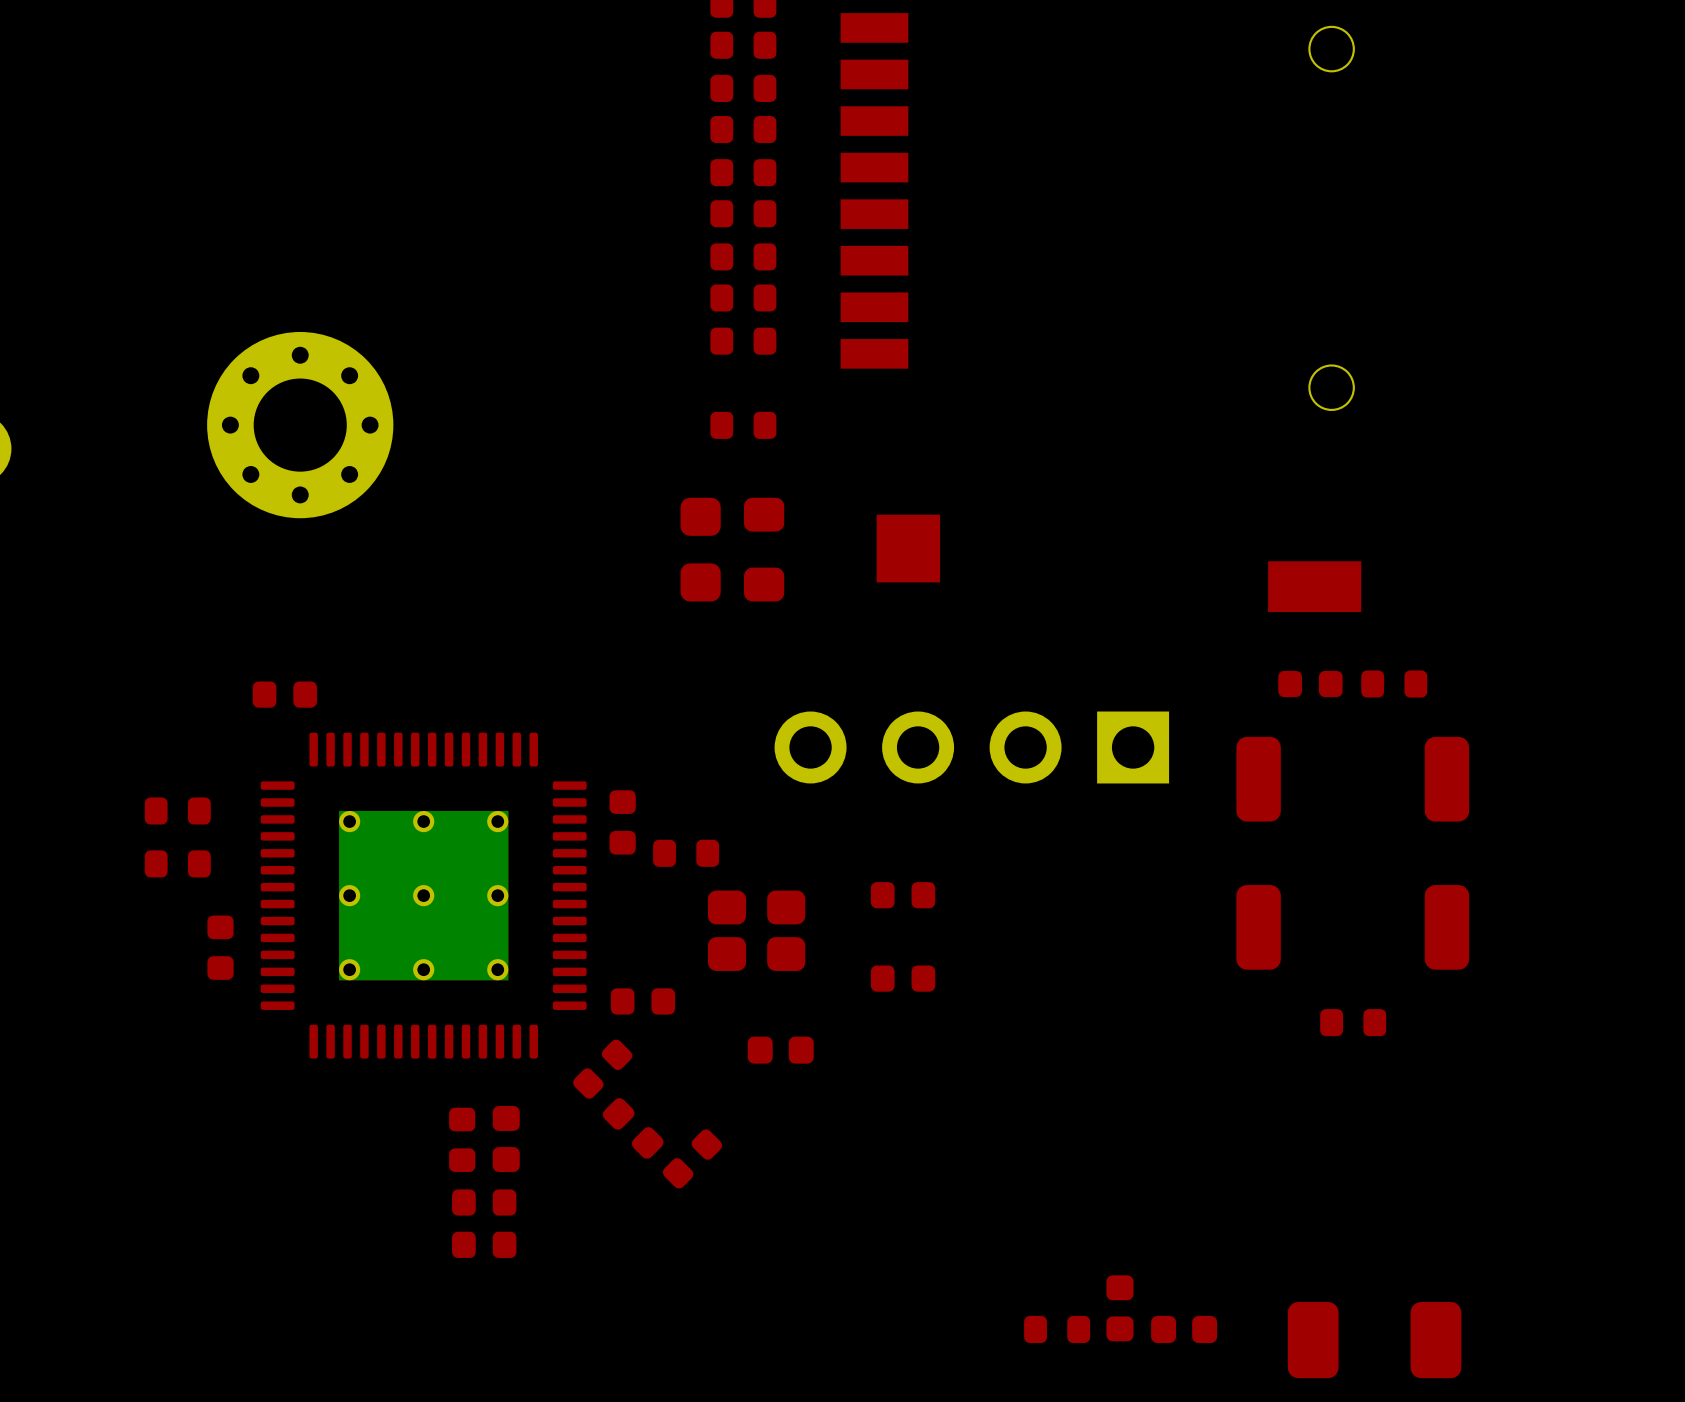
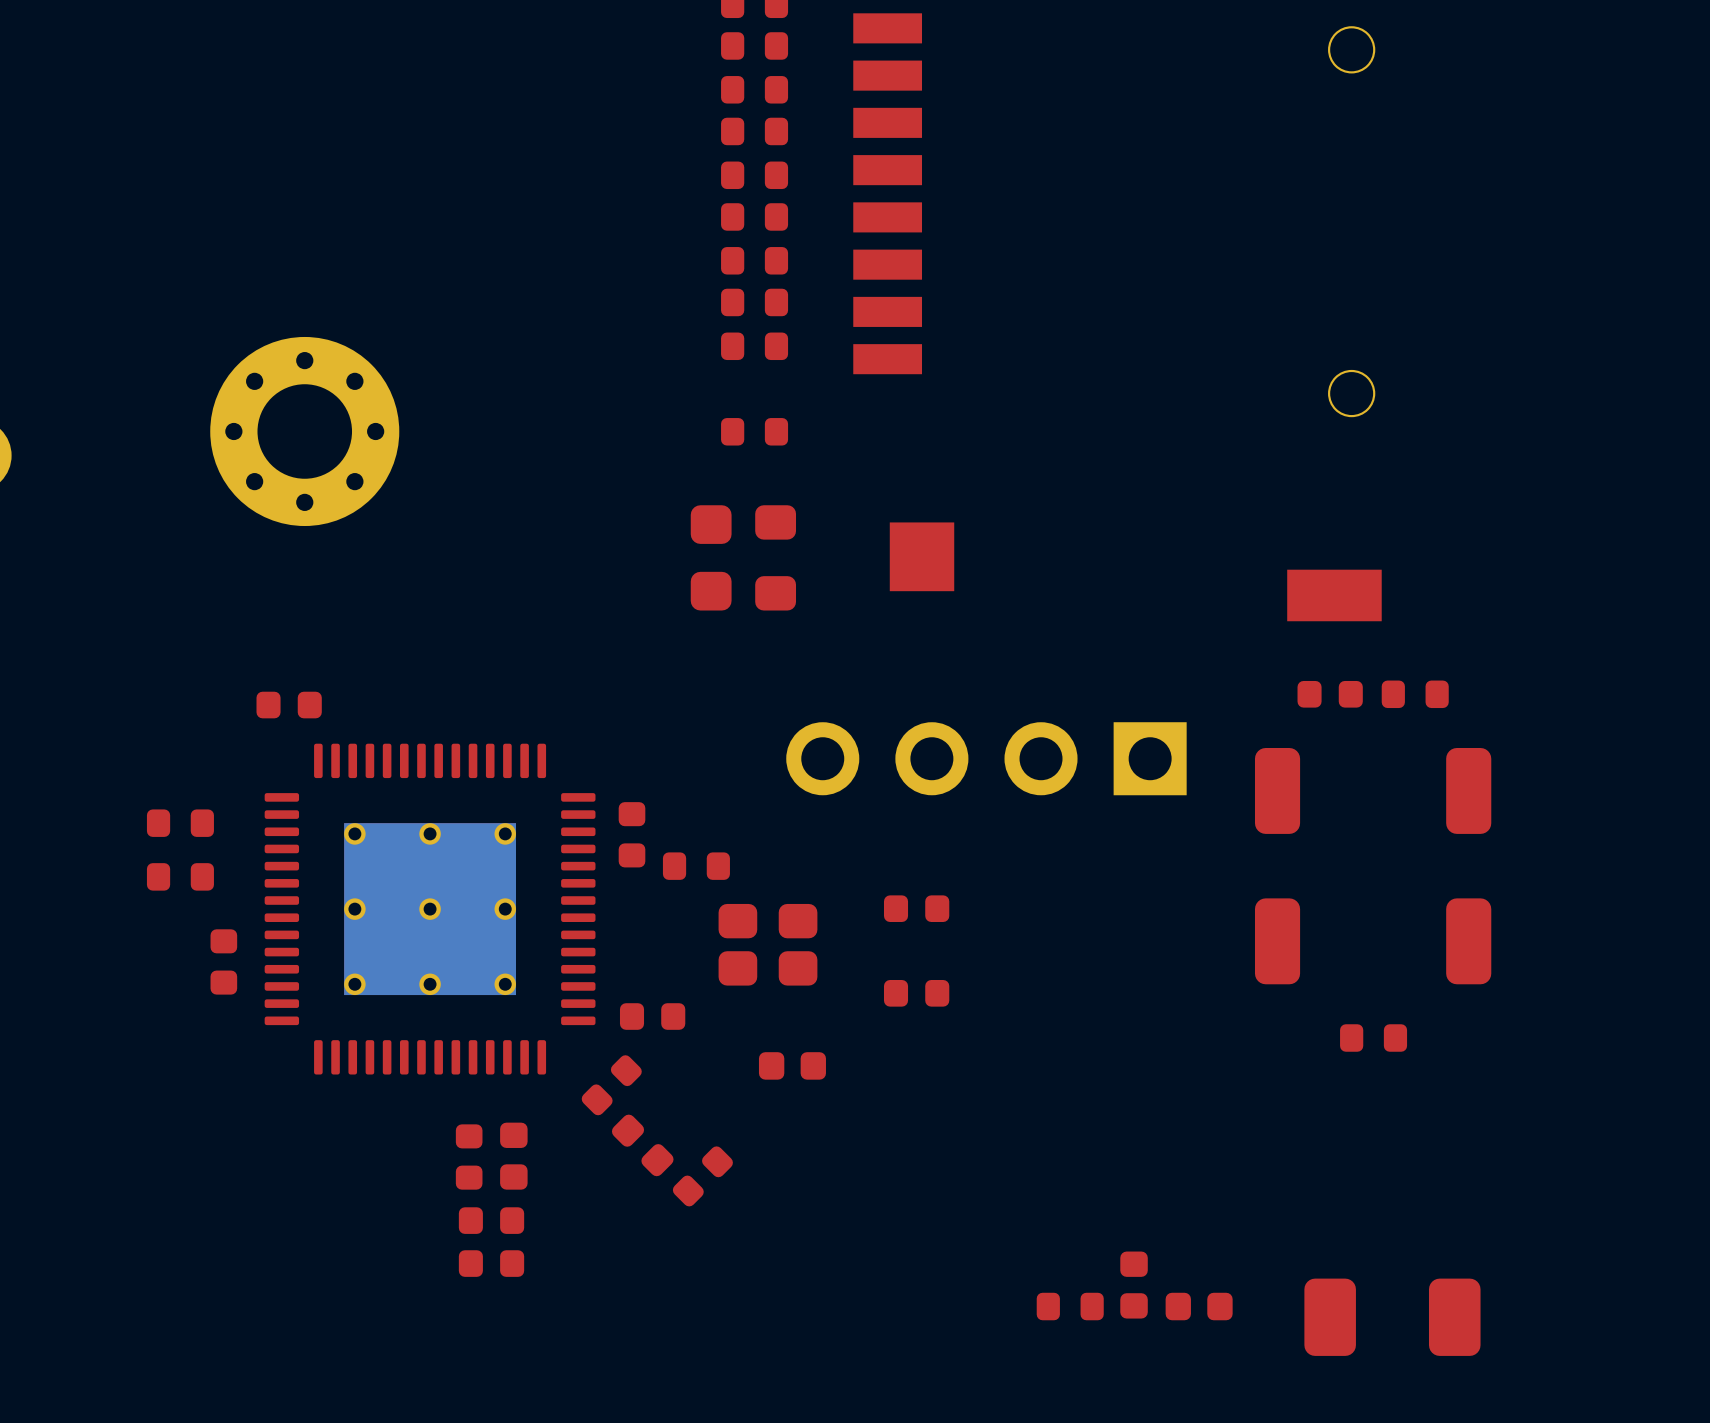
part: none -> (1134, 1285)
part: none -> (1199, 1306)
part: (1119, 1308) -> none
part position: (1057, 1329) -> (1070, 1306)
part: (1184, 1329) -> none
part position: (1374, 1340) -> (1392, 1317)

